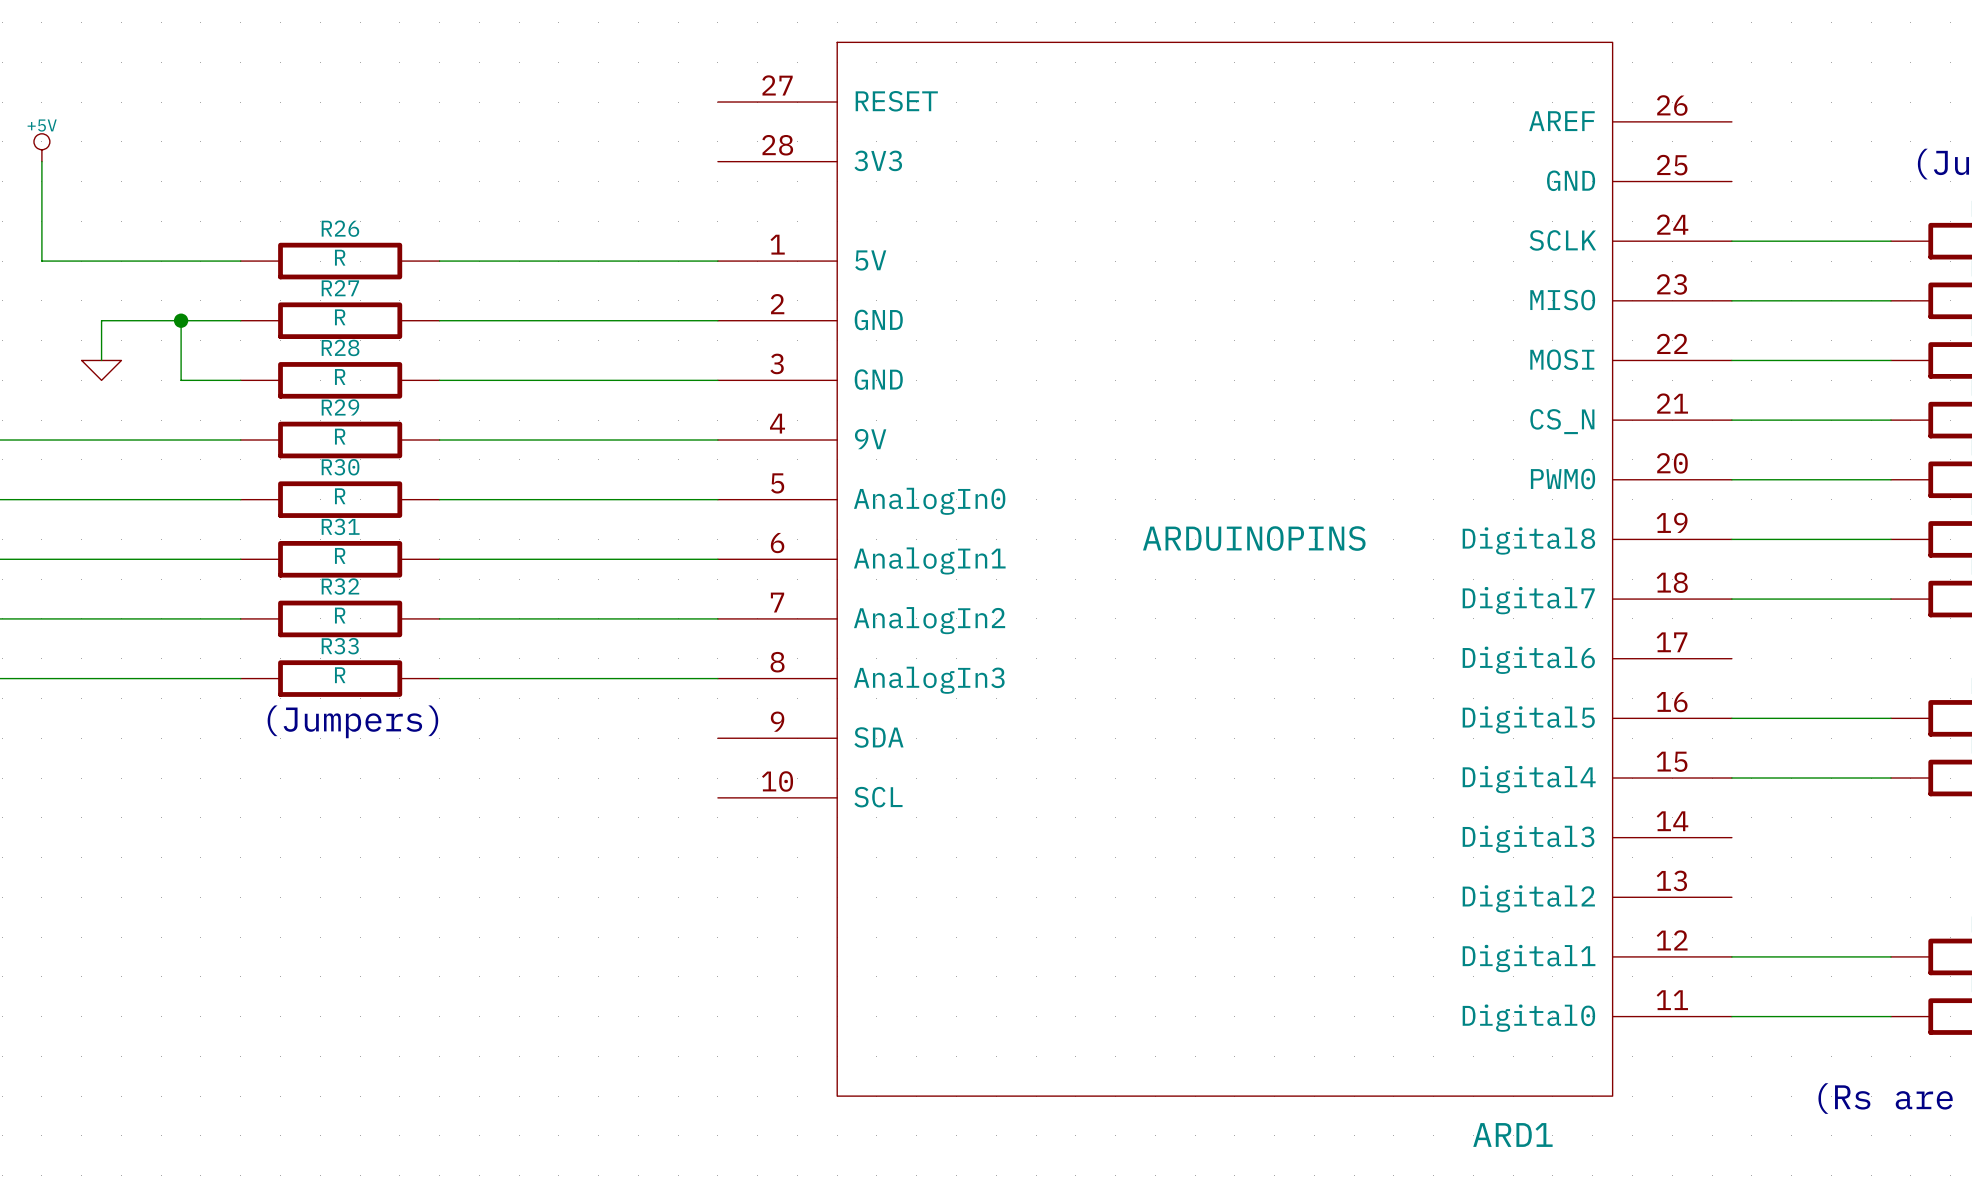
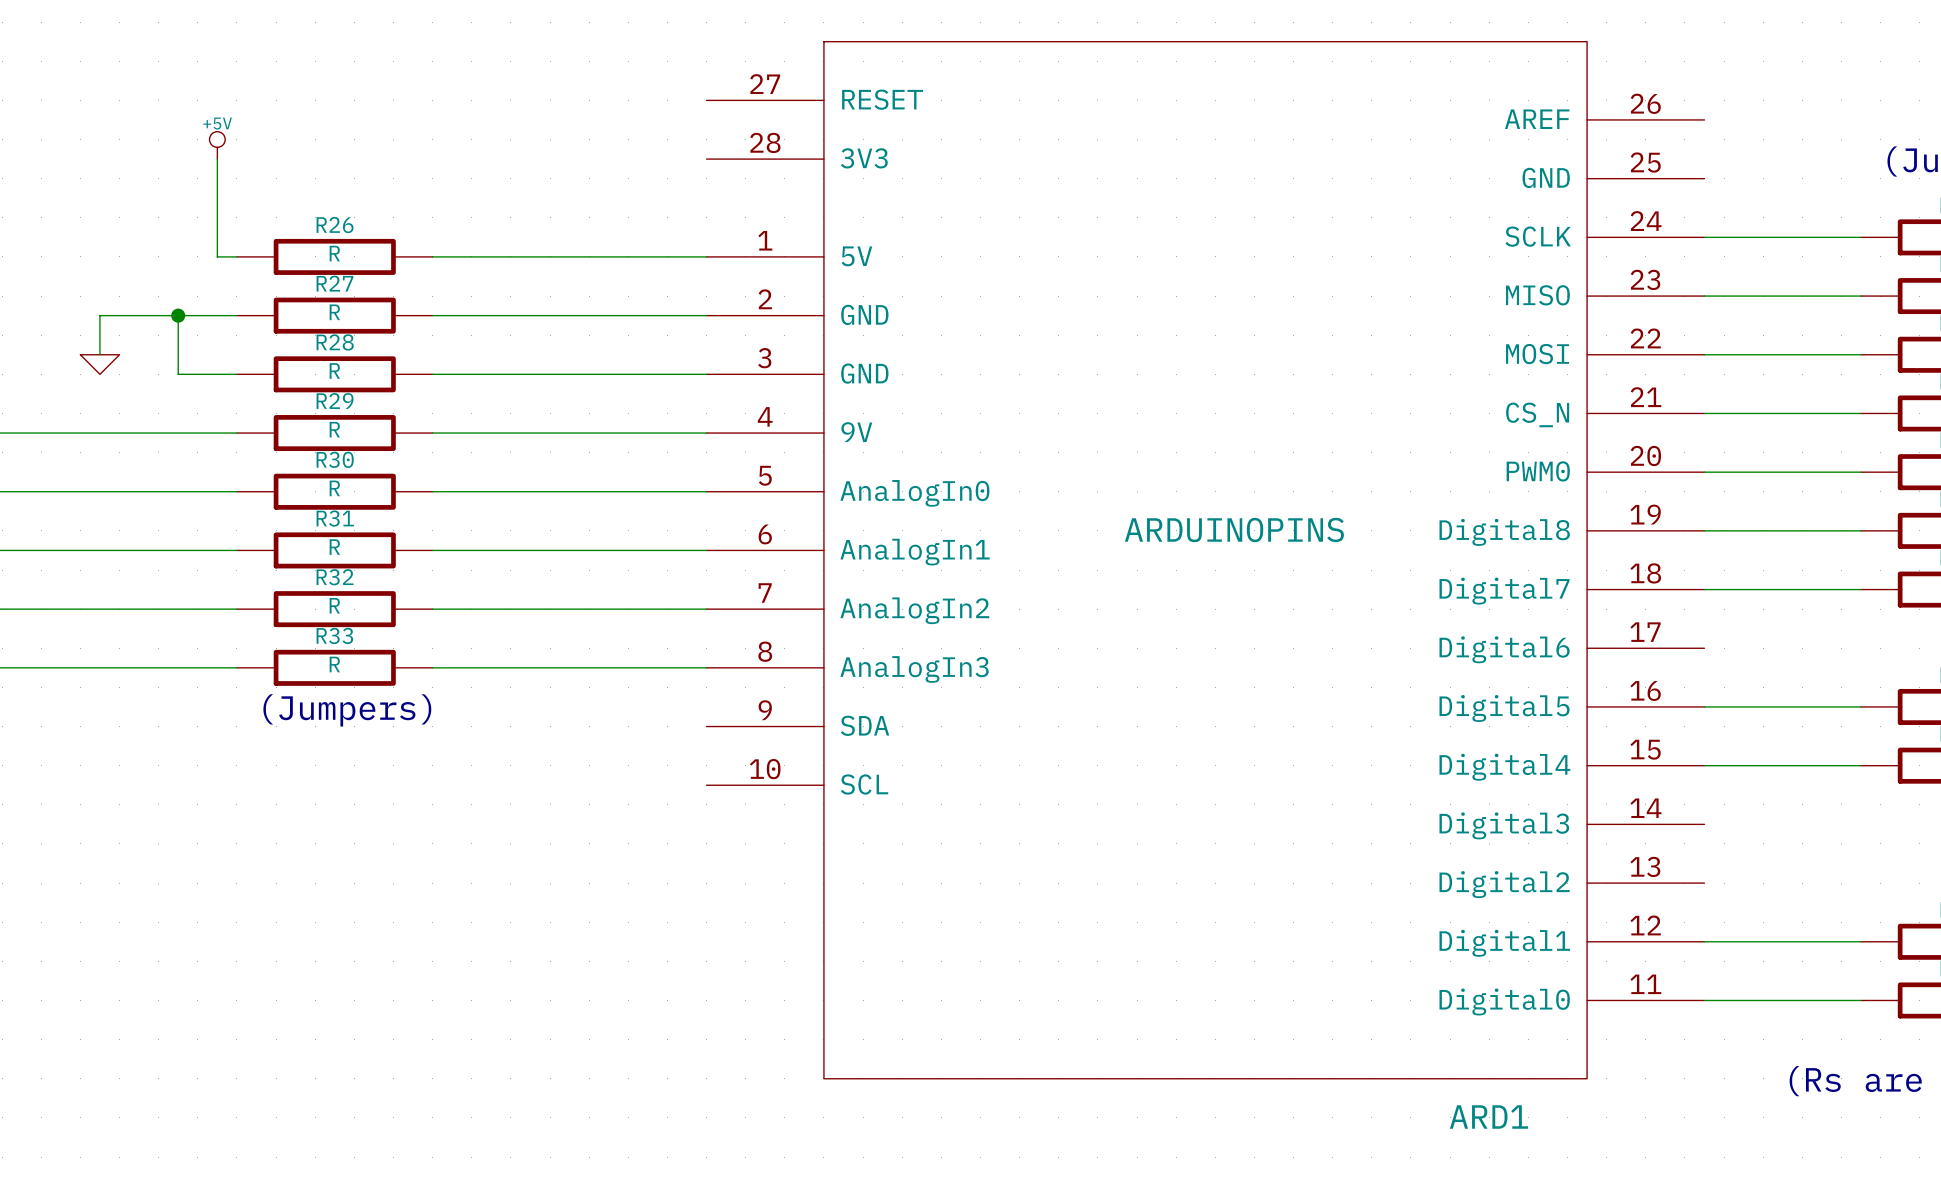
power symbol position: +5V (41, 147) -> +5V (217, 145)
wire: (41, 161) (41, 261) (220, 261) -> (217, 159) (217, 256)

